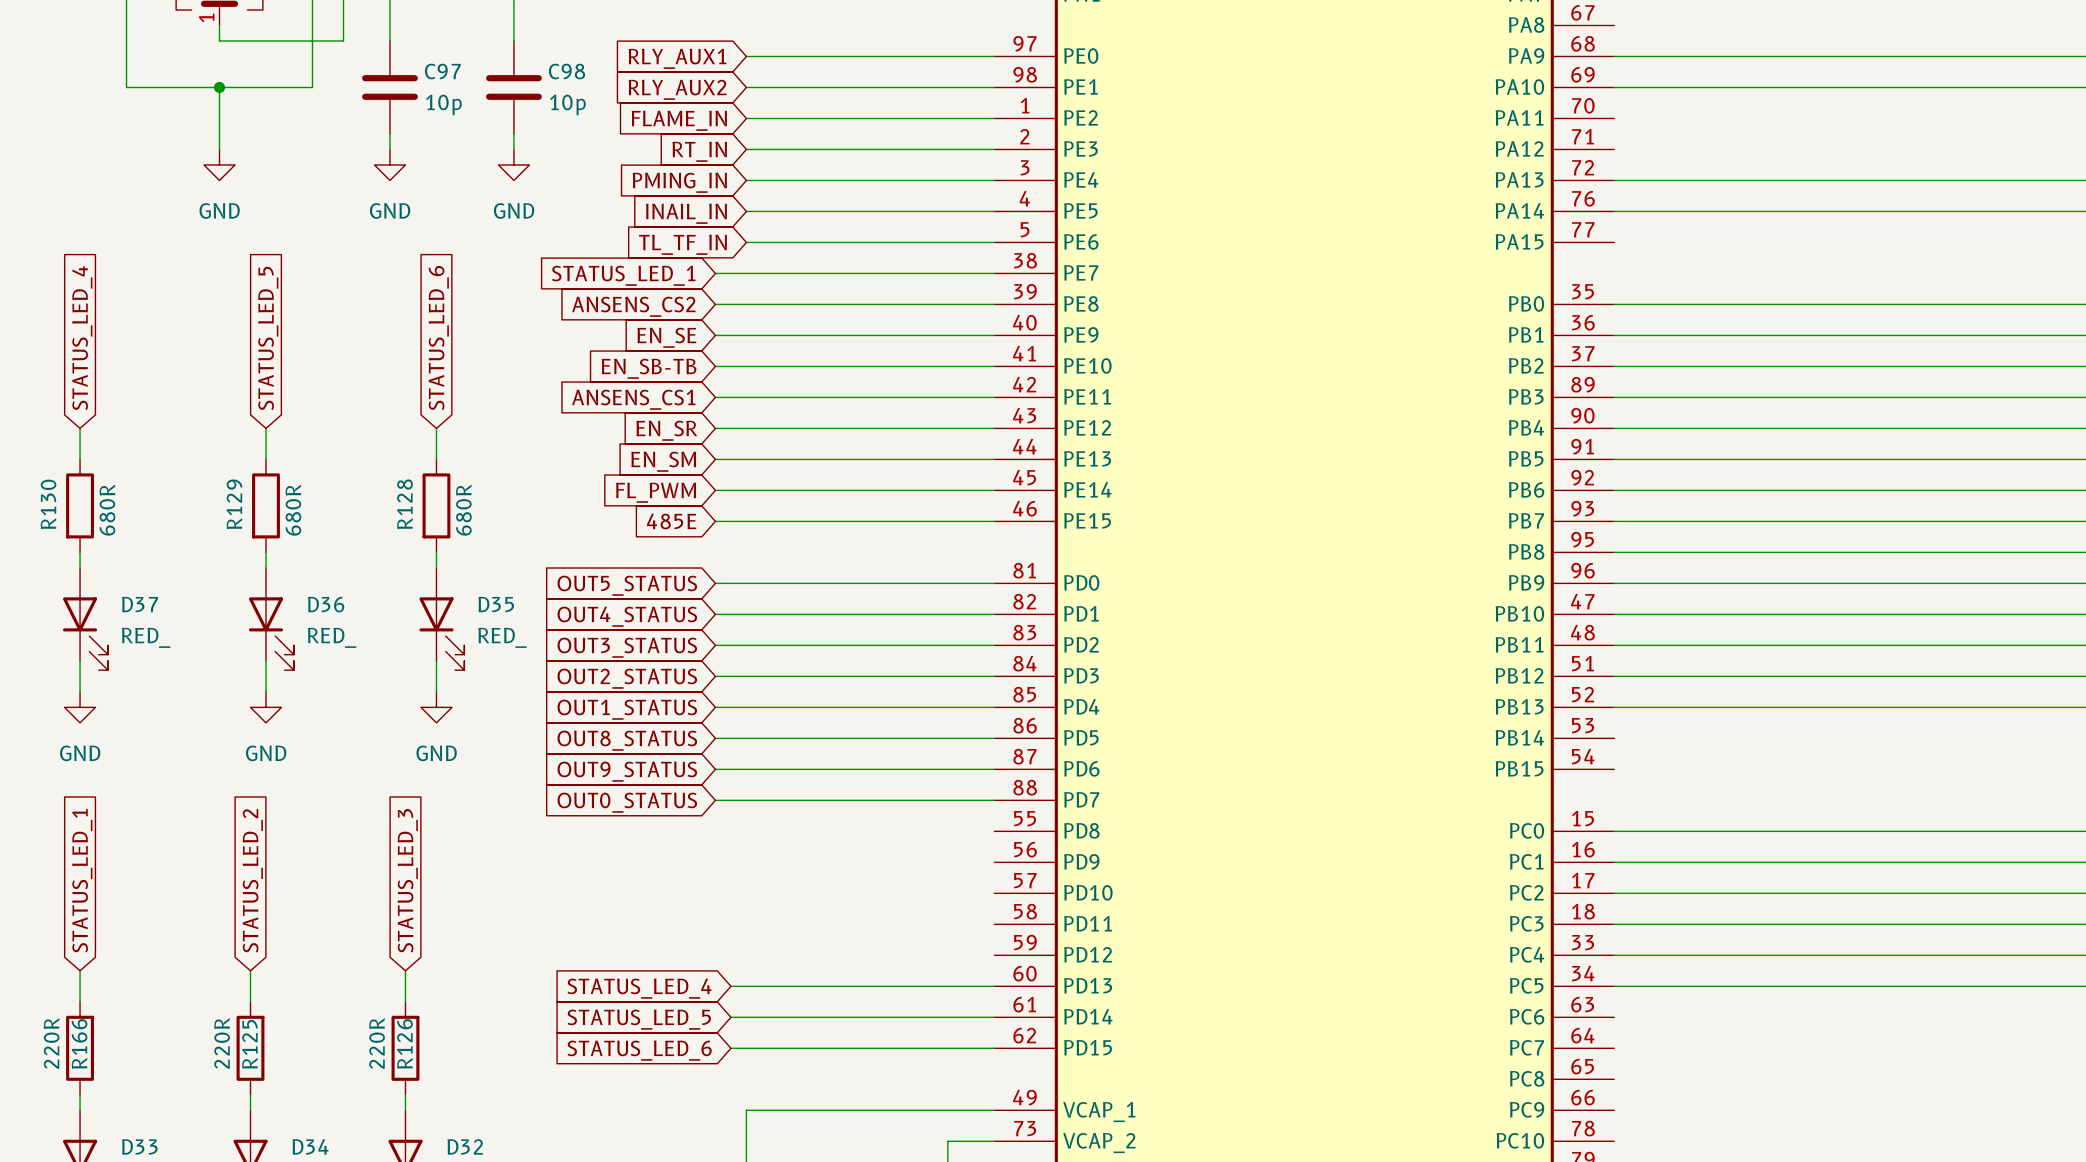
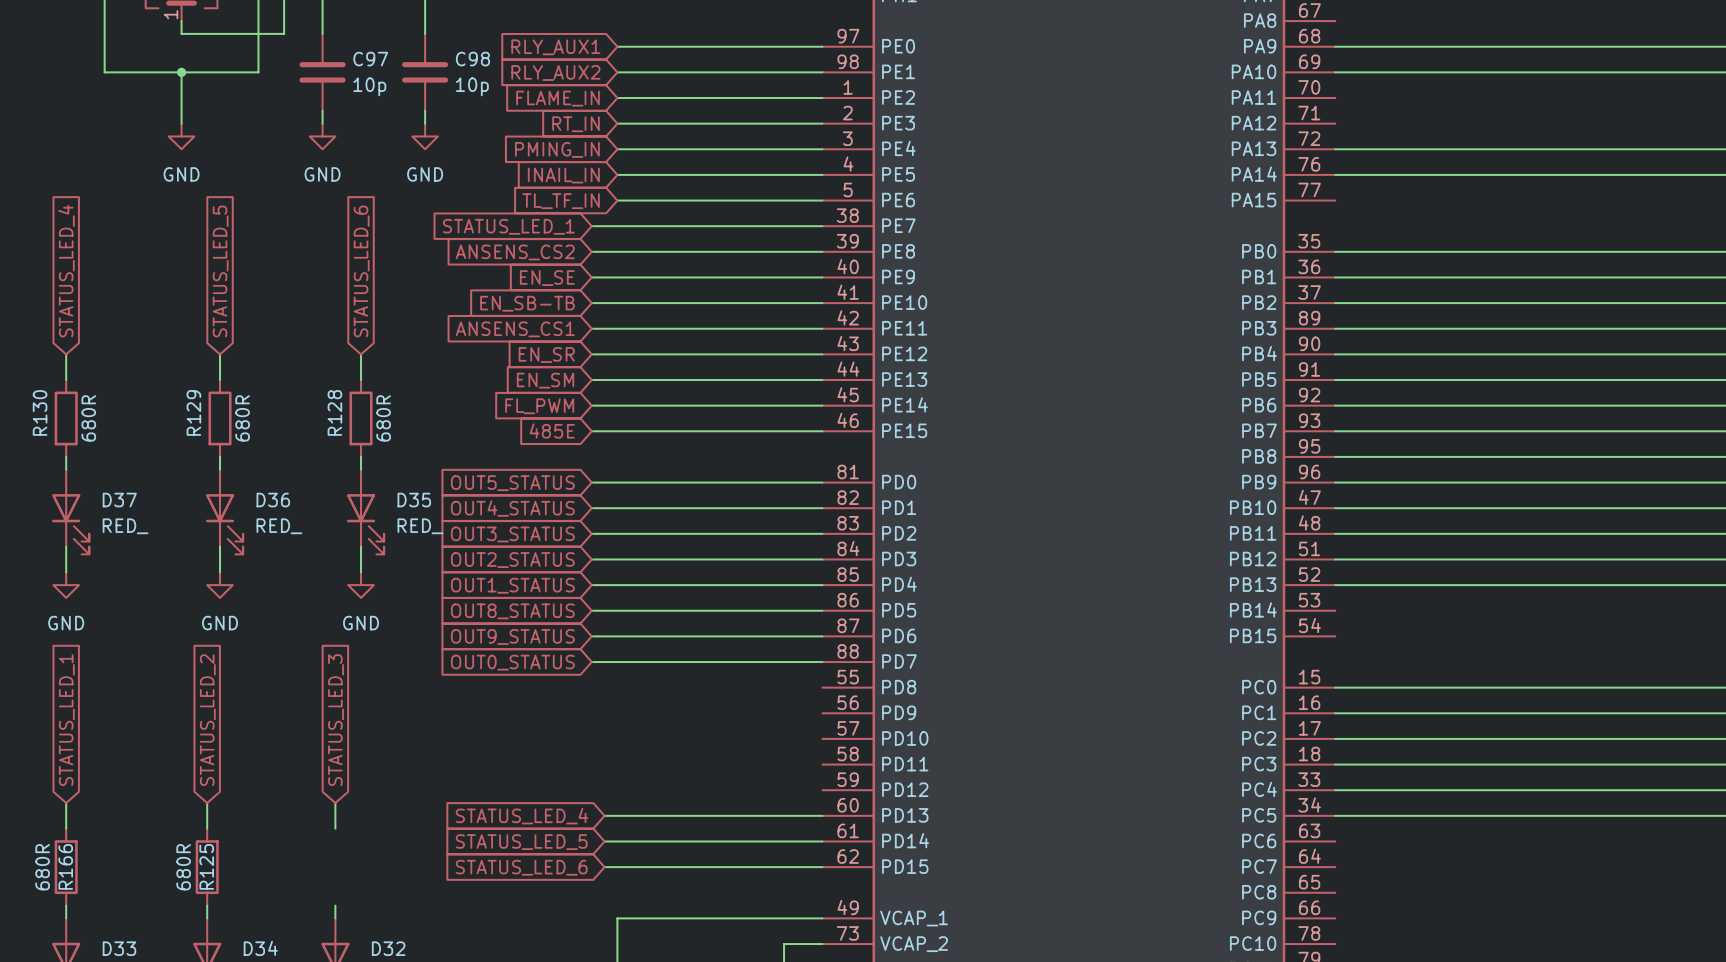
R166 value: 220R (51, 1043) -> 680R (42, 867)
R125 value: 220R (222, 1043) -> 680R (183, 867)
R126: 220R (405, 1048) -> none

